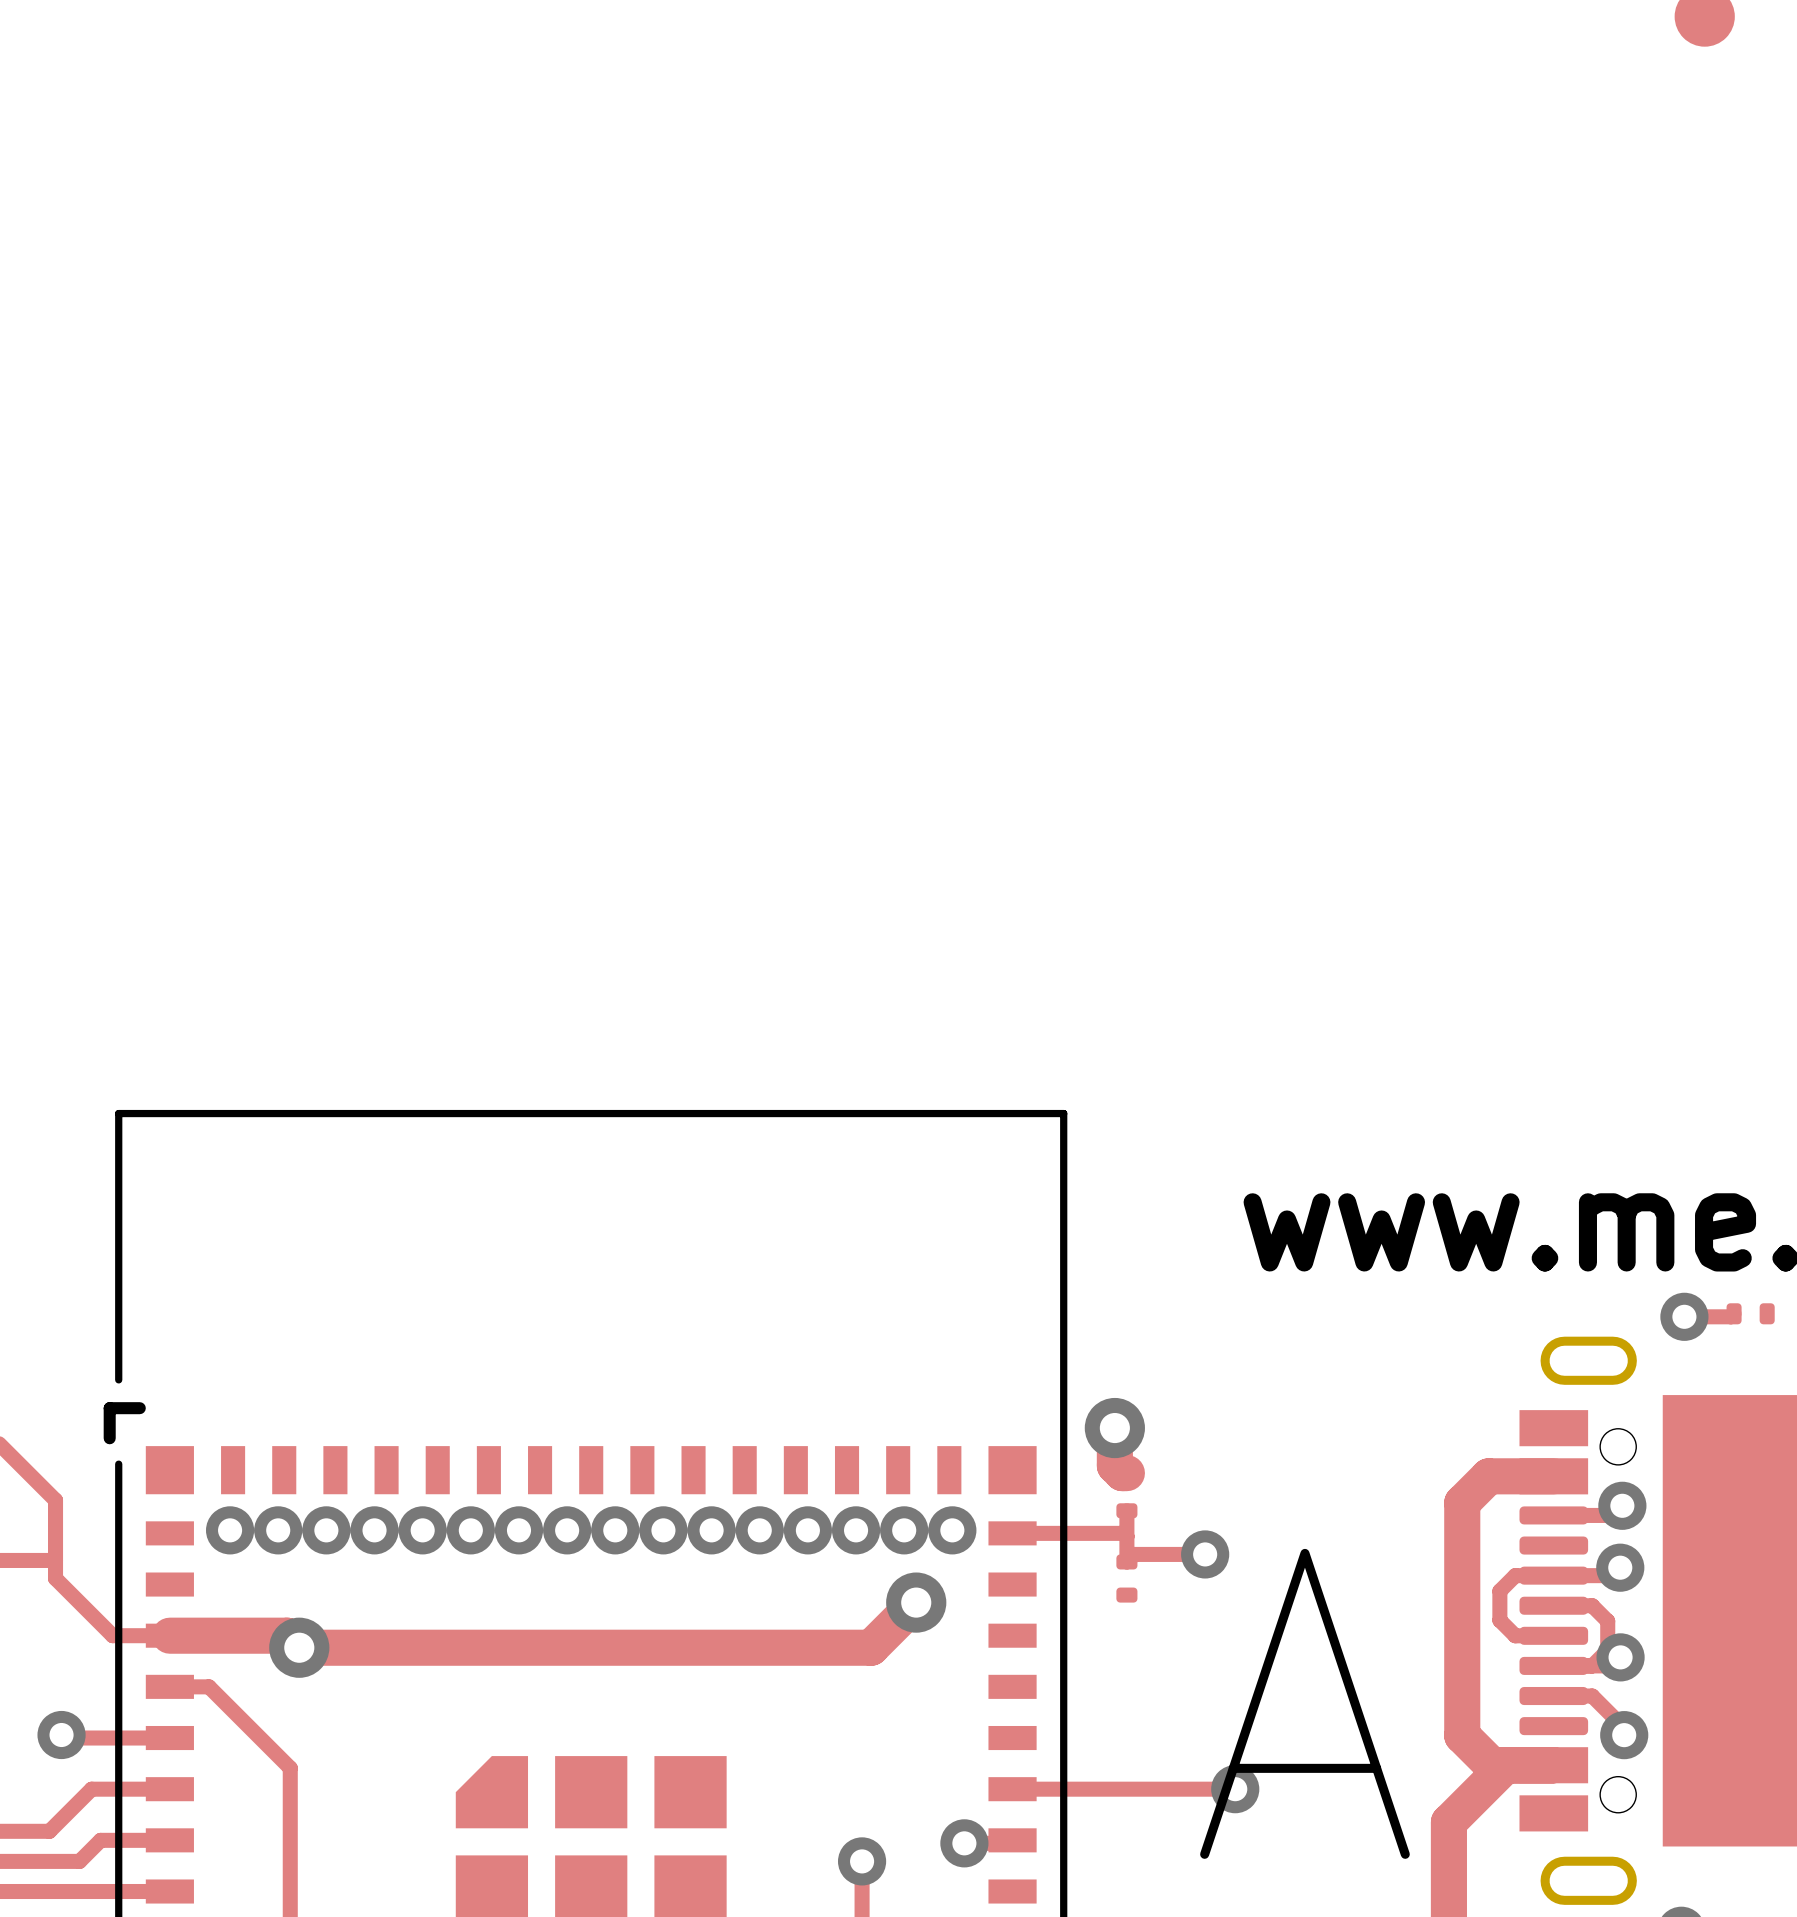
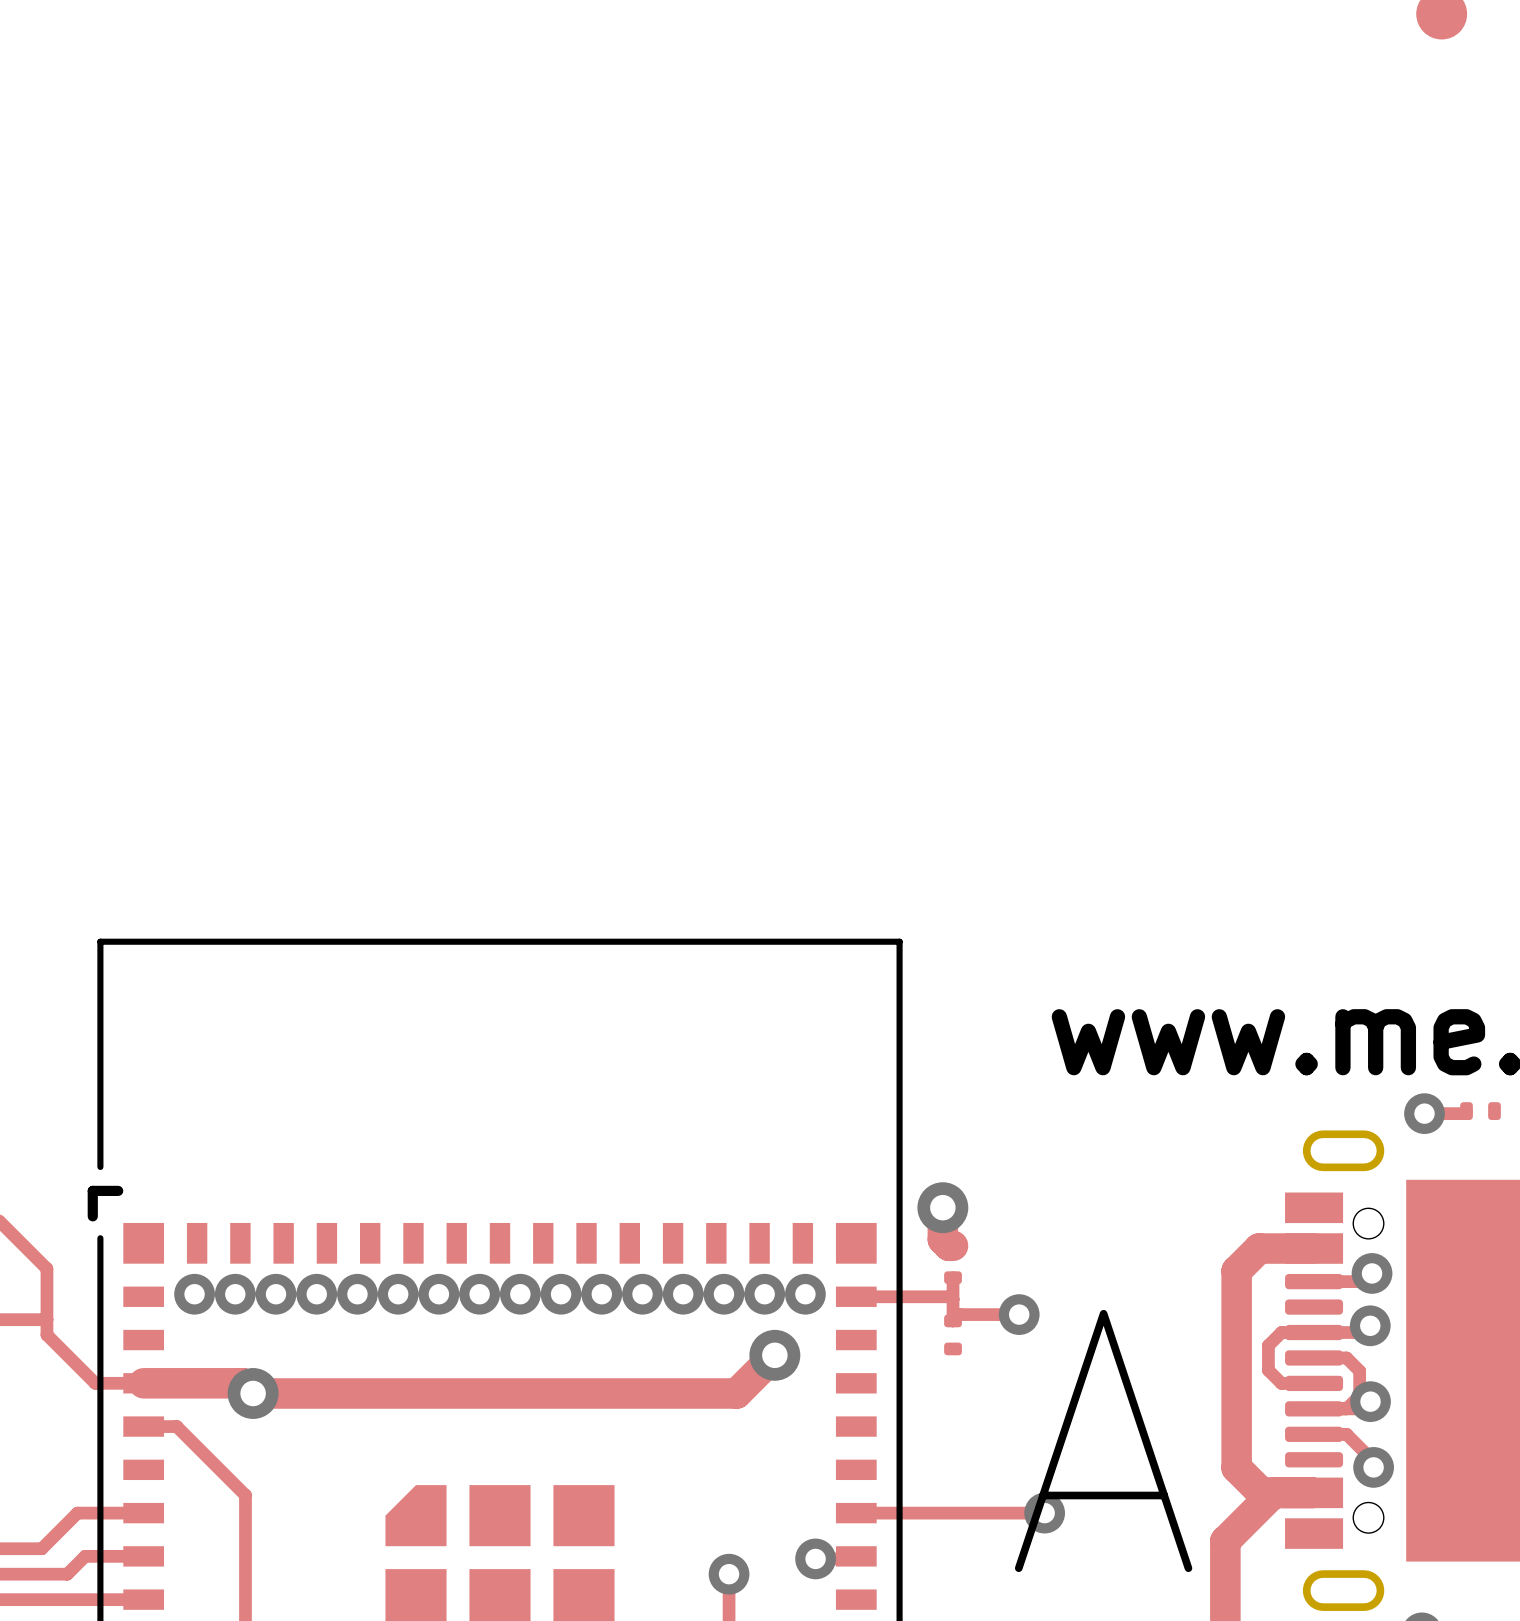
track: (61, 1735) (64, 1738) (169, 1738) -> none
via: (61, 1735) -> none

